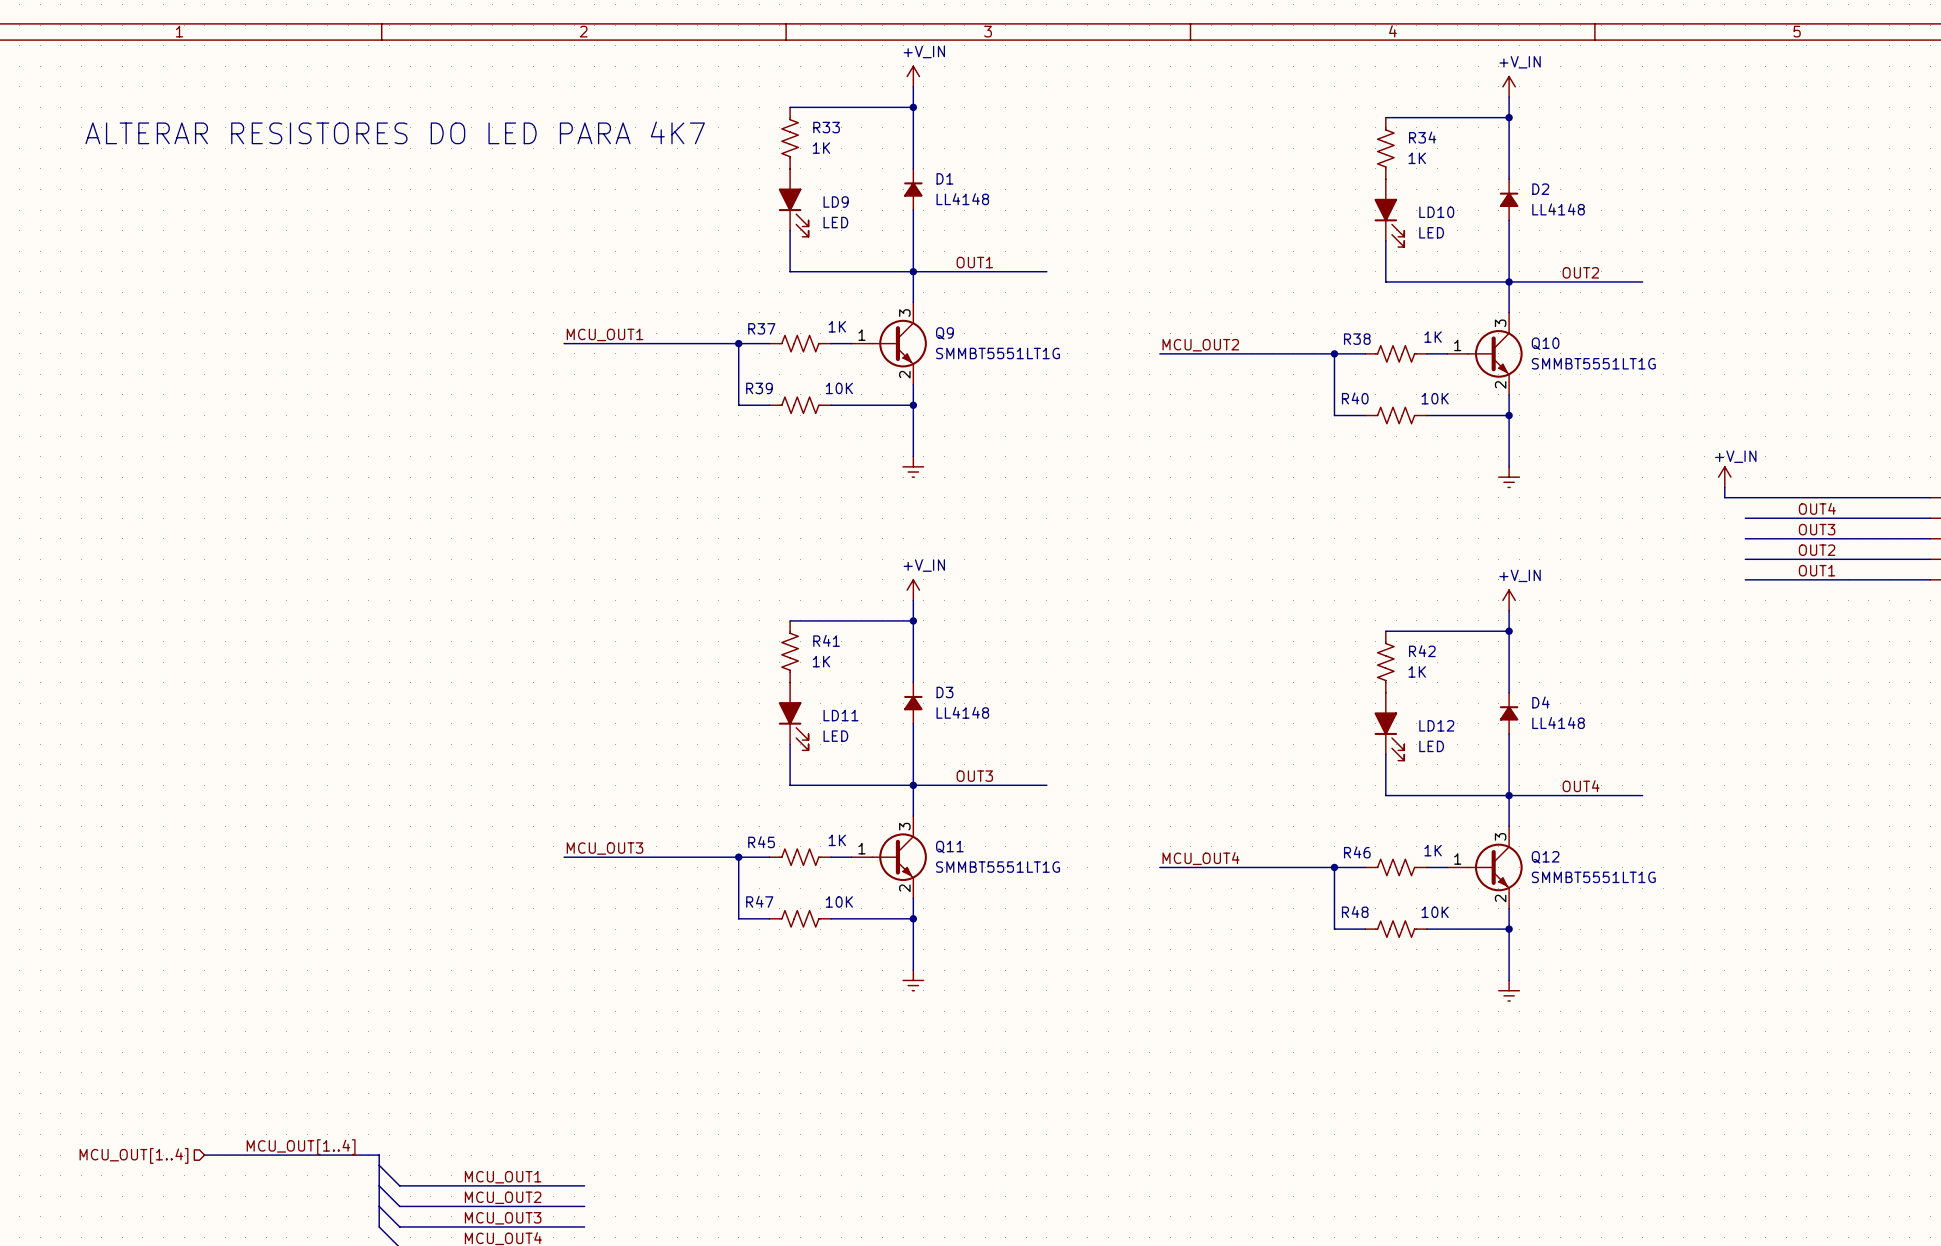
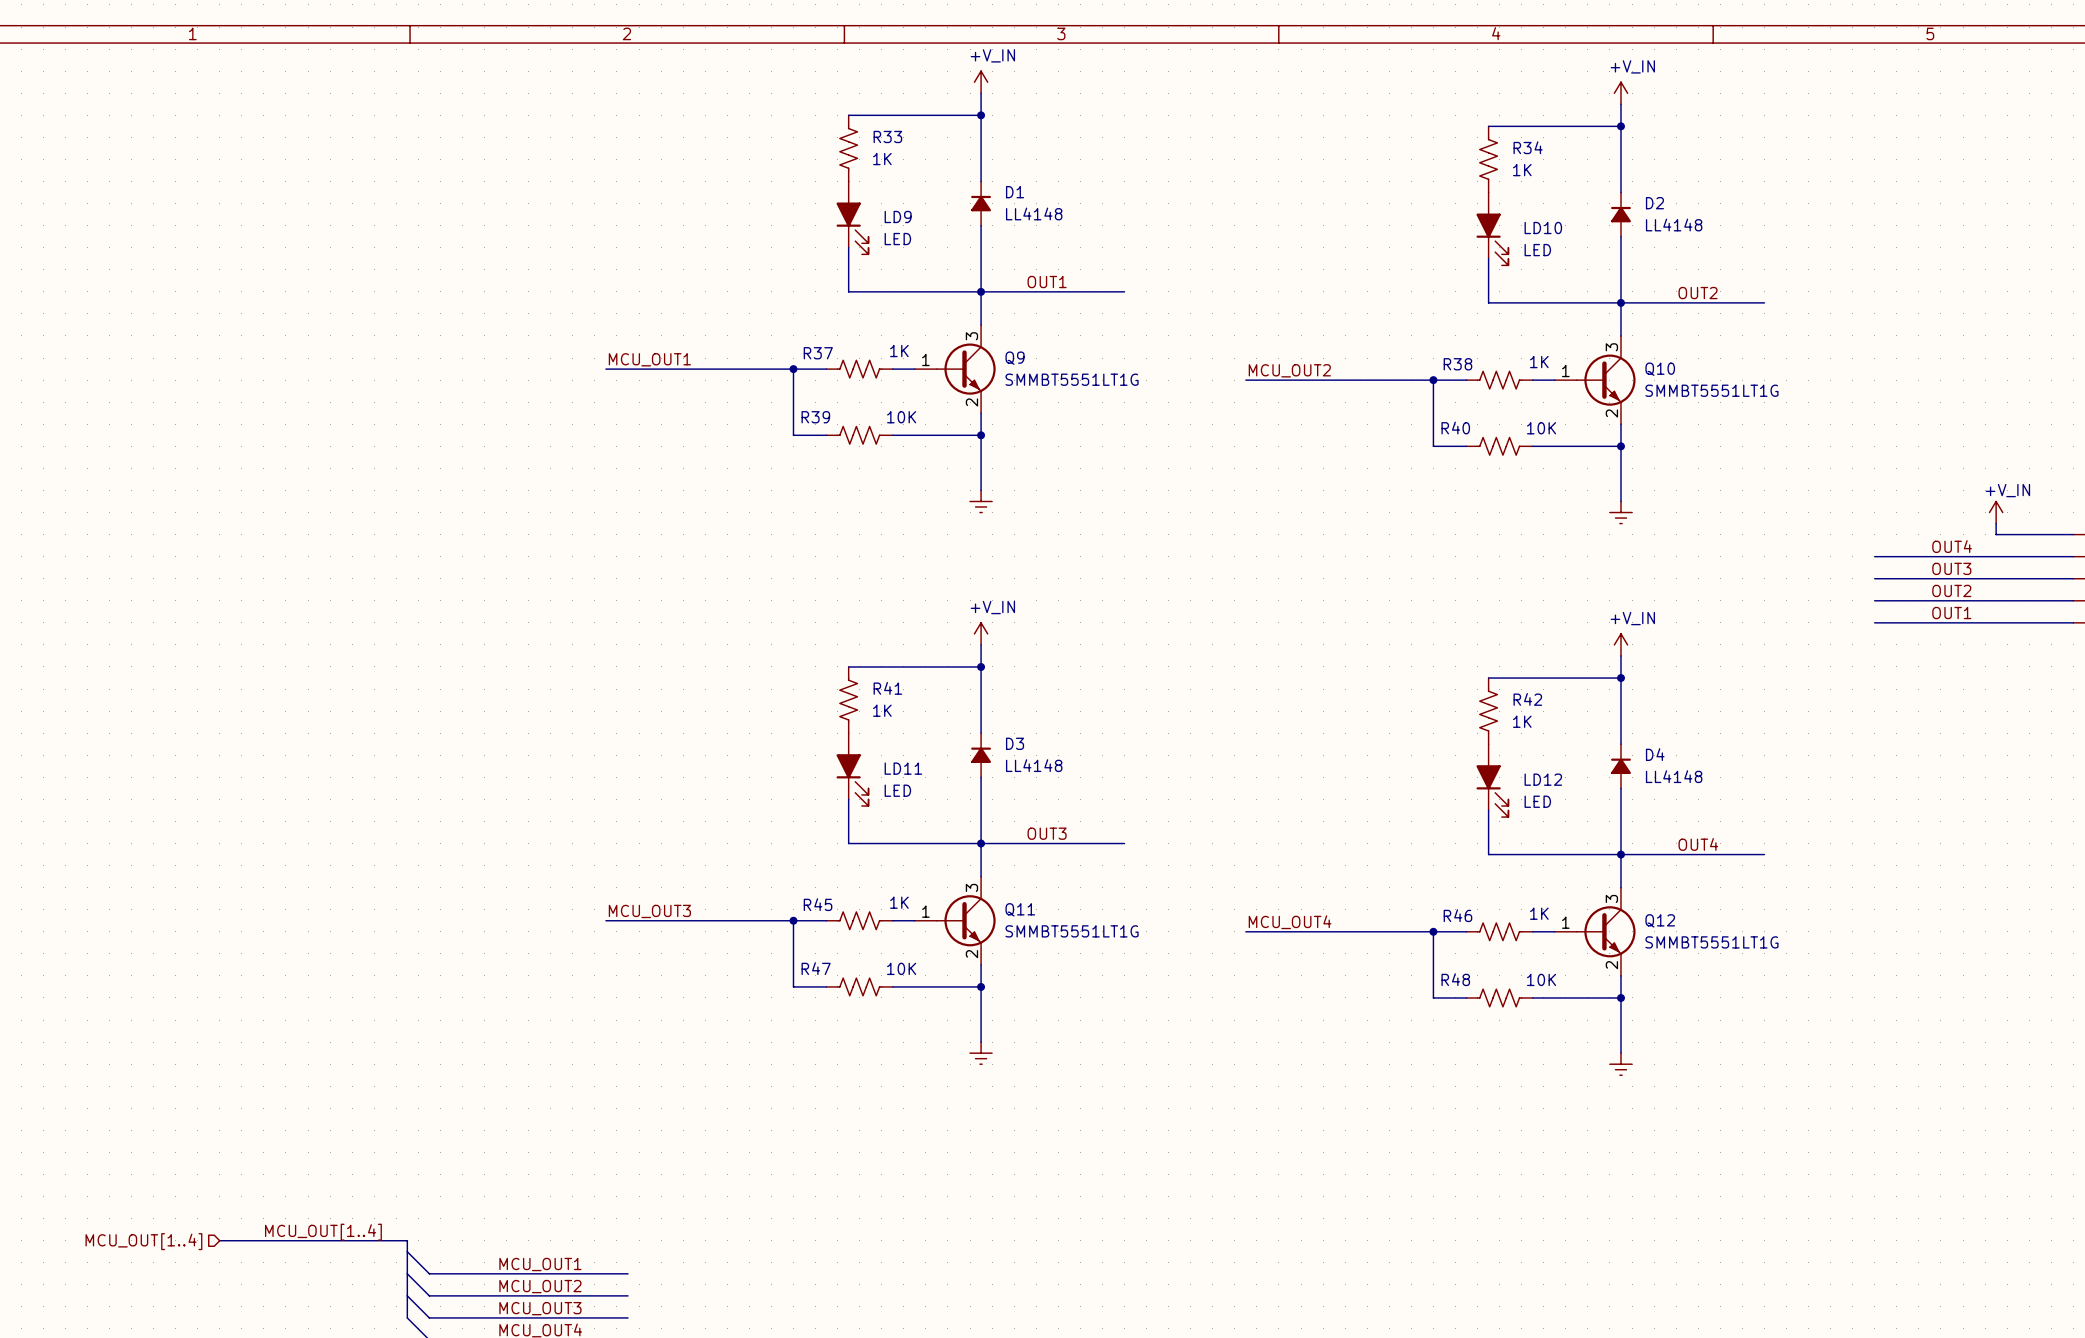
text: ALTERAR RESISTORES DO LED PARA 4K7 (395, 132) -> none
power symbol position: +V_IN (1724, 477) -> +V_IN (1996, 512)
wire: (1724, 487) (1724, 497) (1858, 497) -> (1996, 523) (1996, 534)

